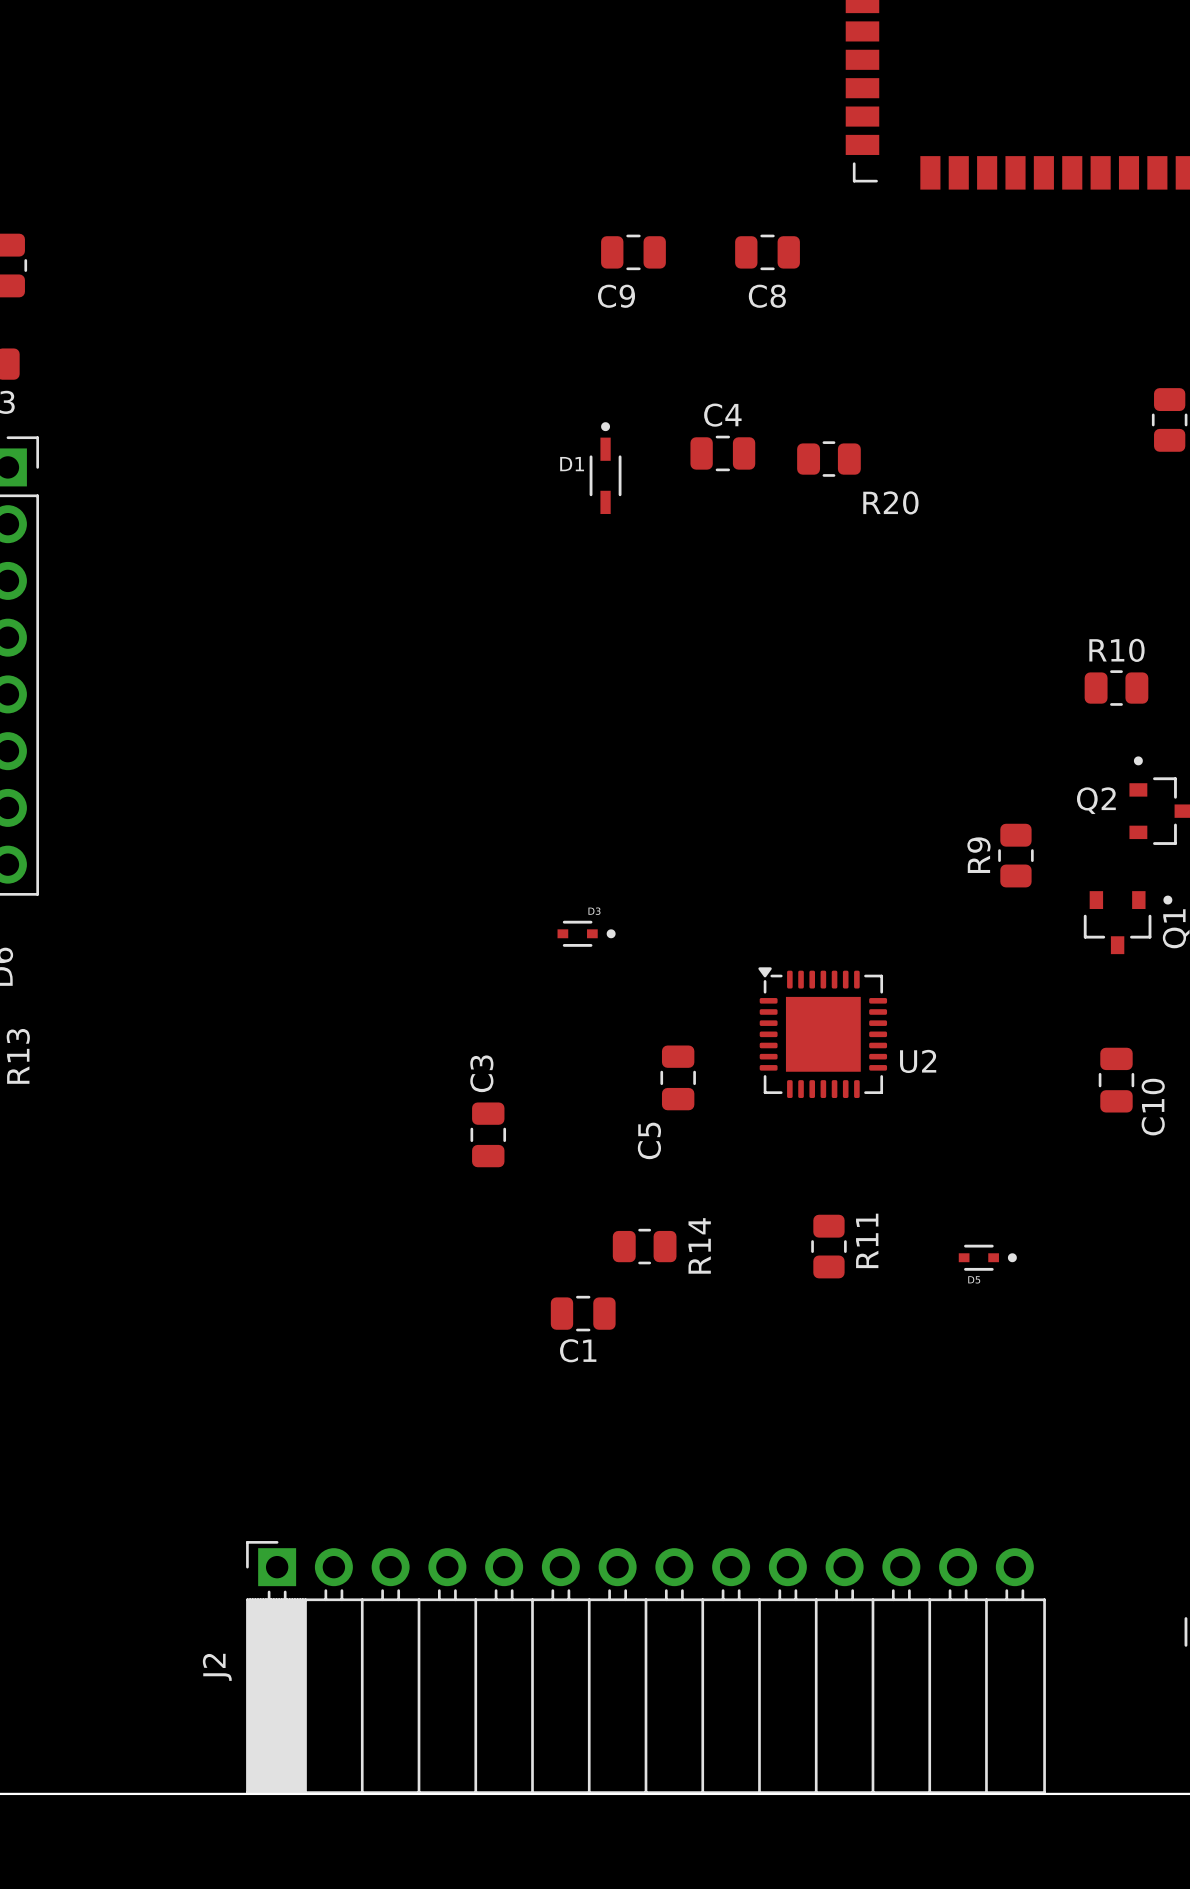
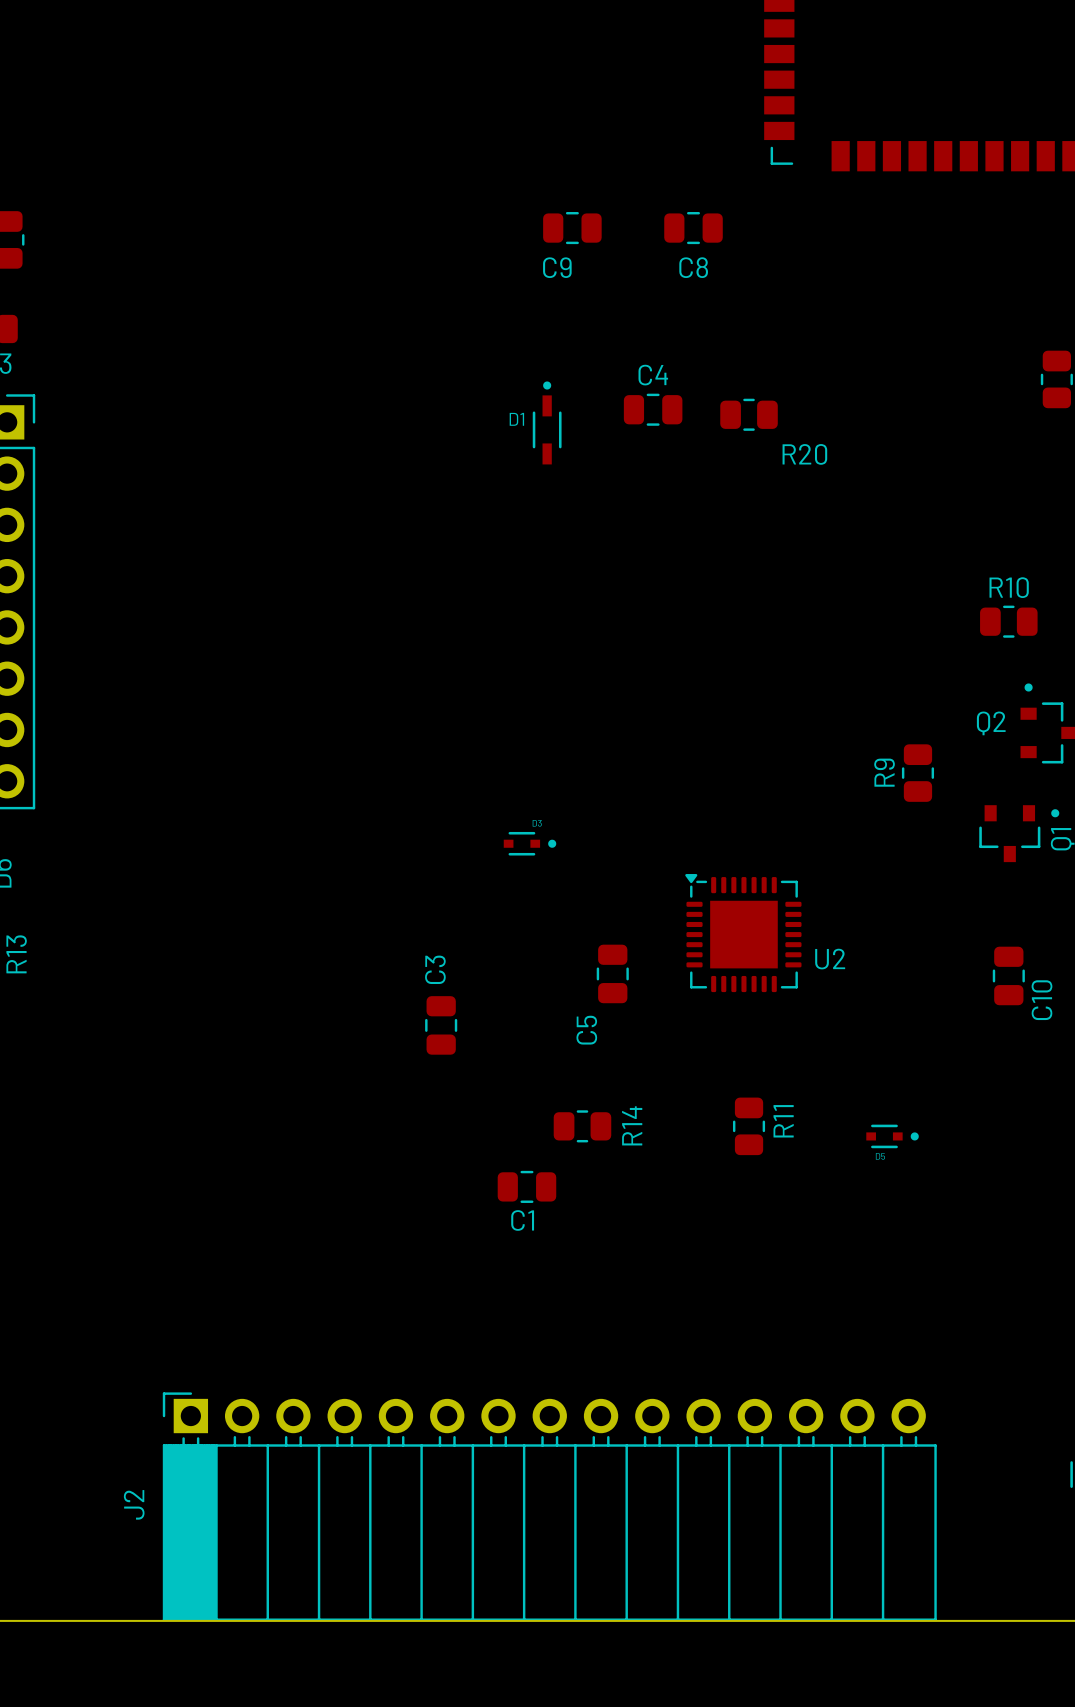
J2 footprint: [246, 1541, 1046, 1794] -> [162, 1392, 937, 1621]

